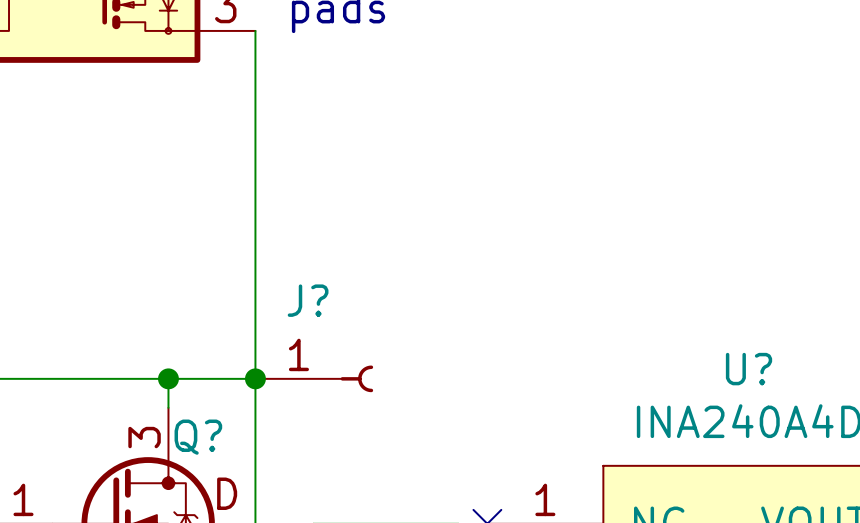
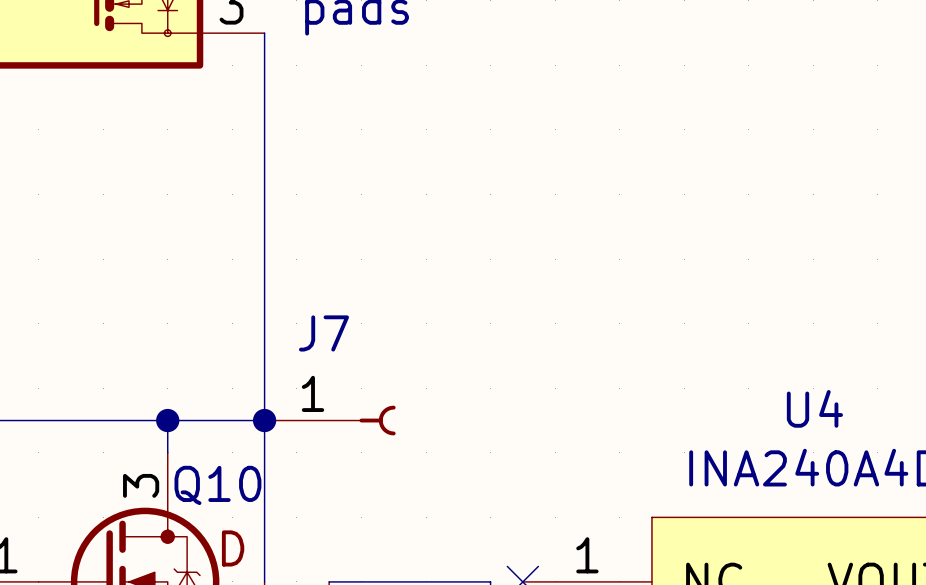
J? name: J? (308, 300) -> J7 (323, 333)
U? name: U? (749, 369) -> U4 (814, 408)
Q? name: Q? (198, 437) -> Q10 (217, 485)

